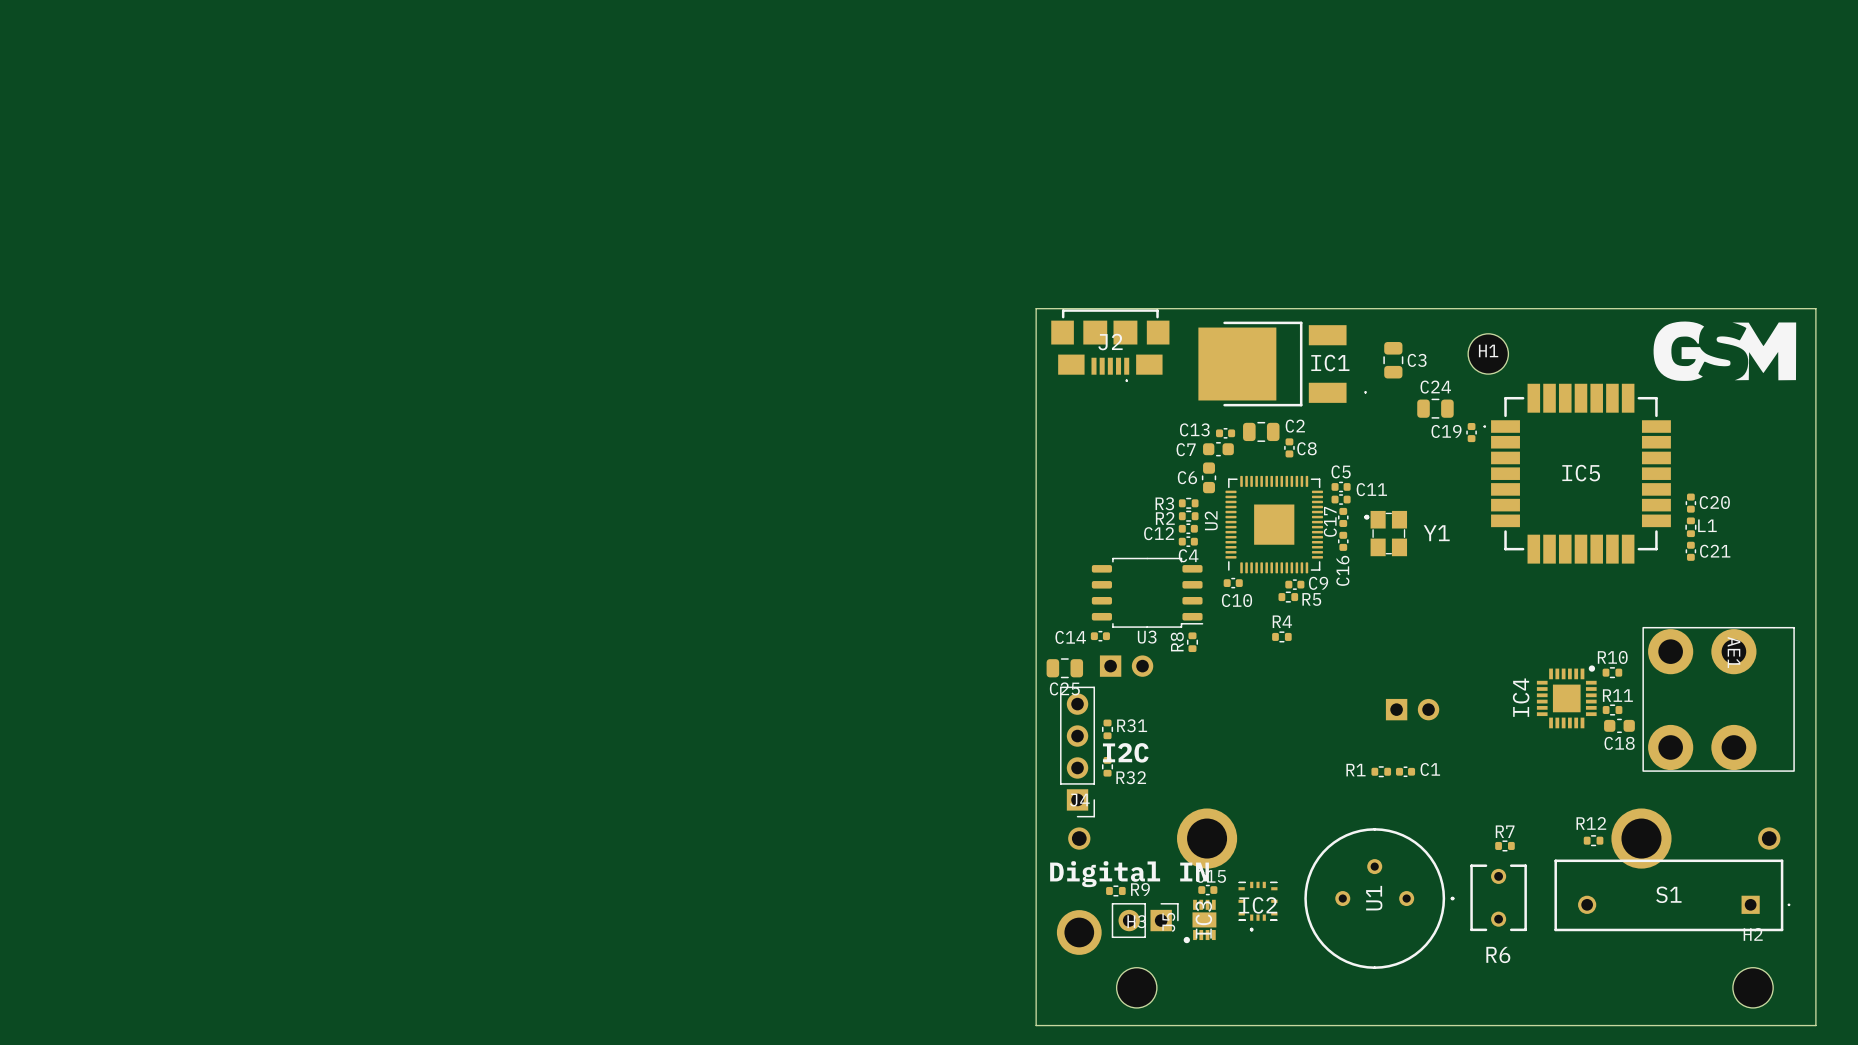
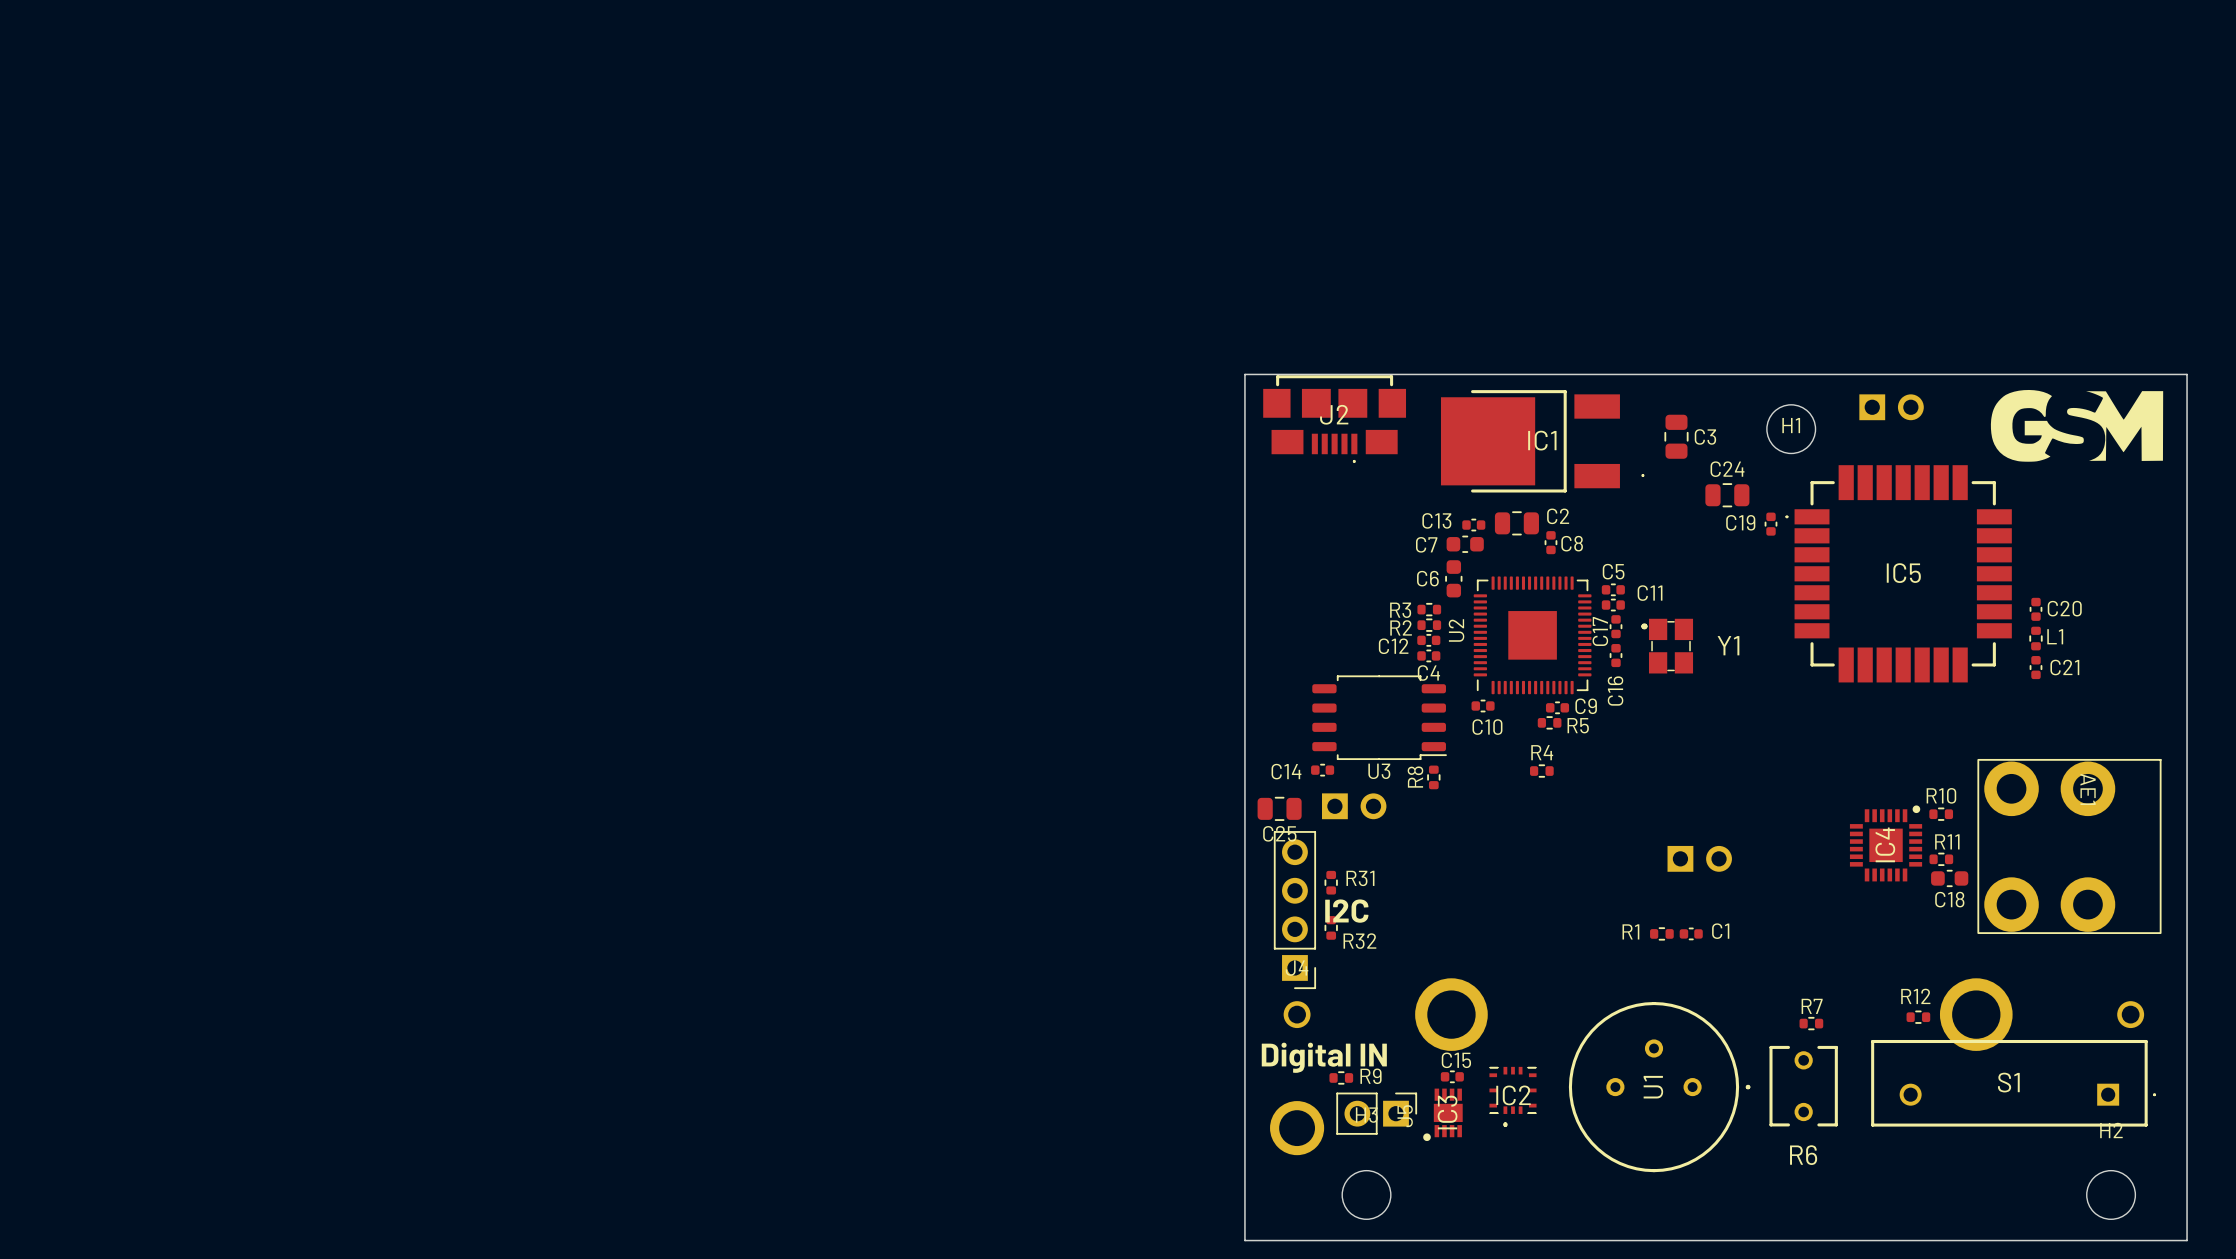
part: none -> (1891, 407)
IC1 name position: IC1 (1330, 363) -> IC1 (1542, 440)
IC4 name position: IC4 (1521, 697) -> IC4 (1885, 844)

